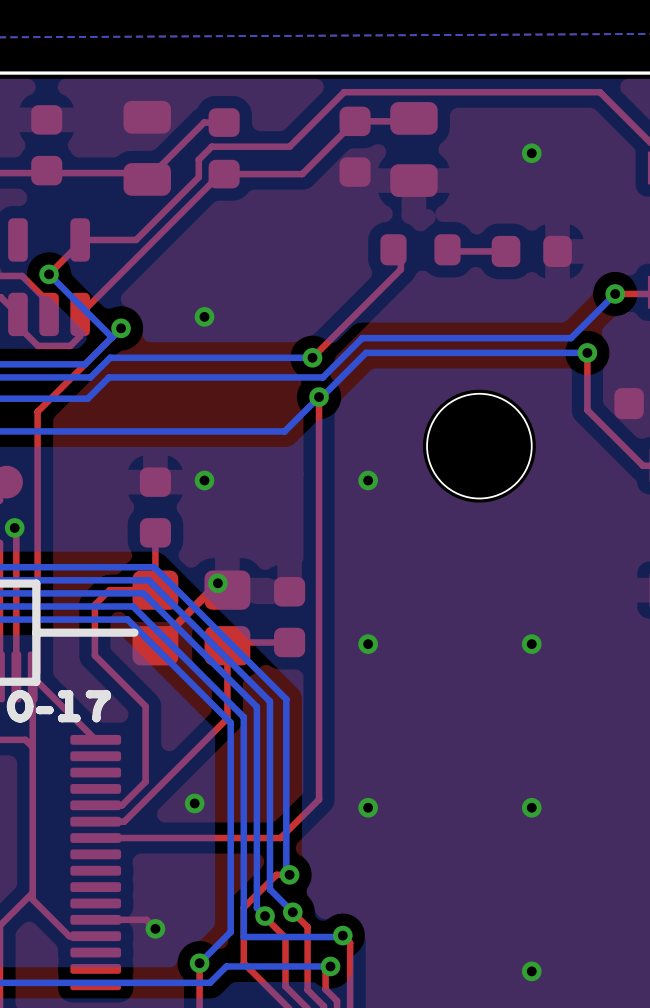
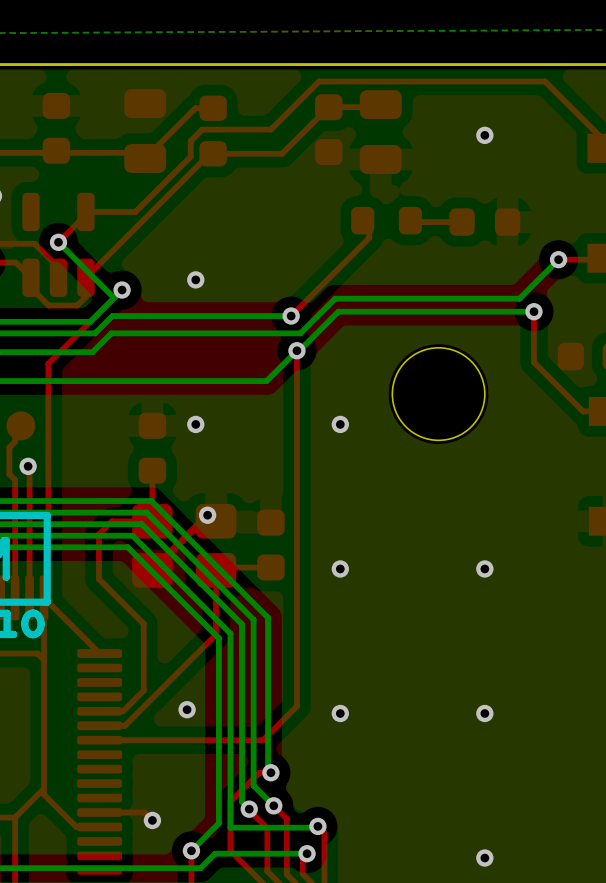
line: (134, 632) (36, 632) -> none
line: (106, 694) (89, 694) (106, 694) (98, 706) (96, 712) (96, 718) (98, 706) (106, 696) (106, 694) -> none
line: (49, 709) (39, 709) (39, 710) (49, 710) (49, 709) -> none
line: (76, 718) (61, 718) (68, 717) (68, 694) (62, 694) (69, 694) (69, 717) (76, 718) -> none

